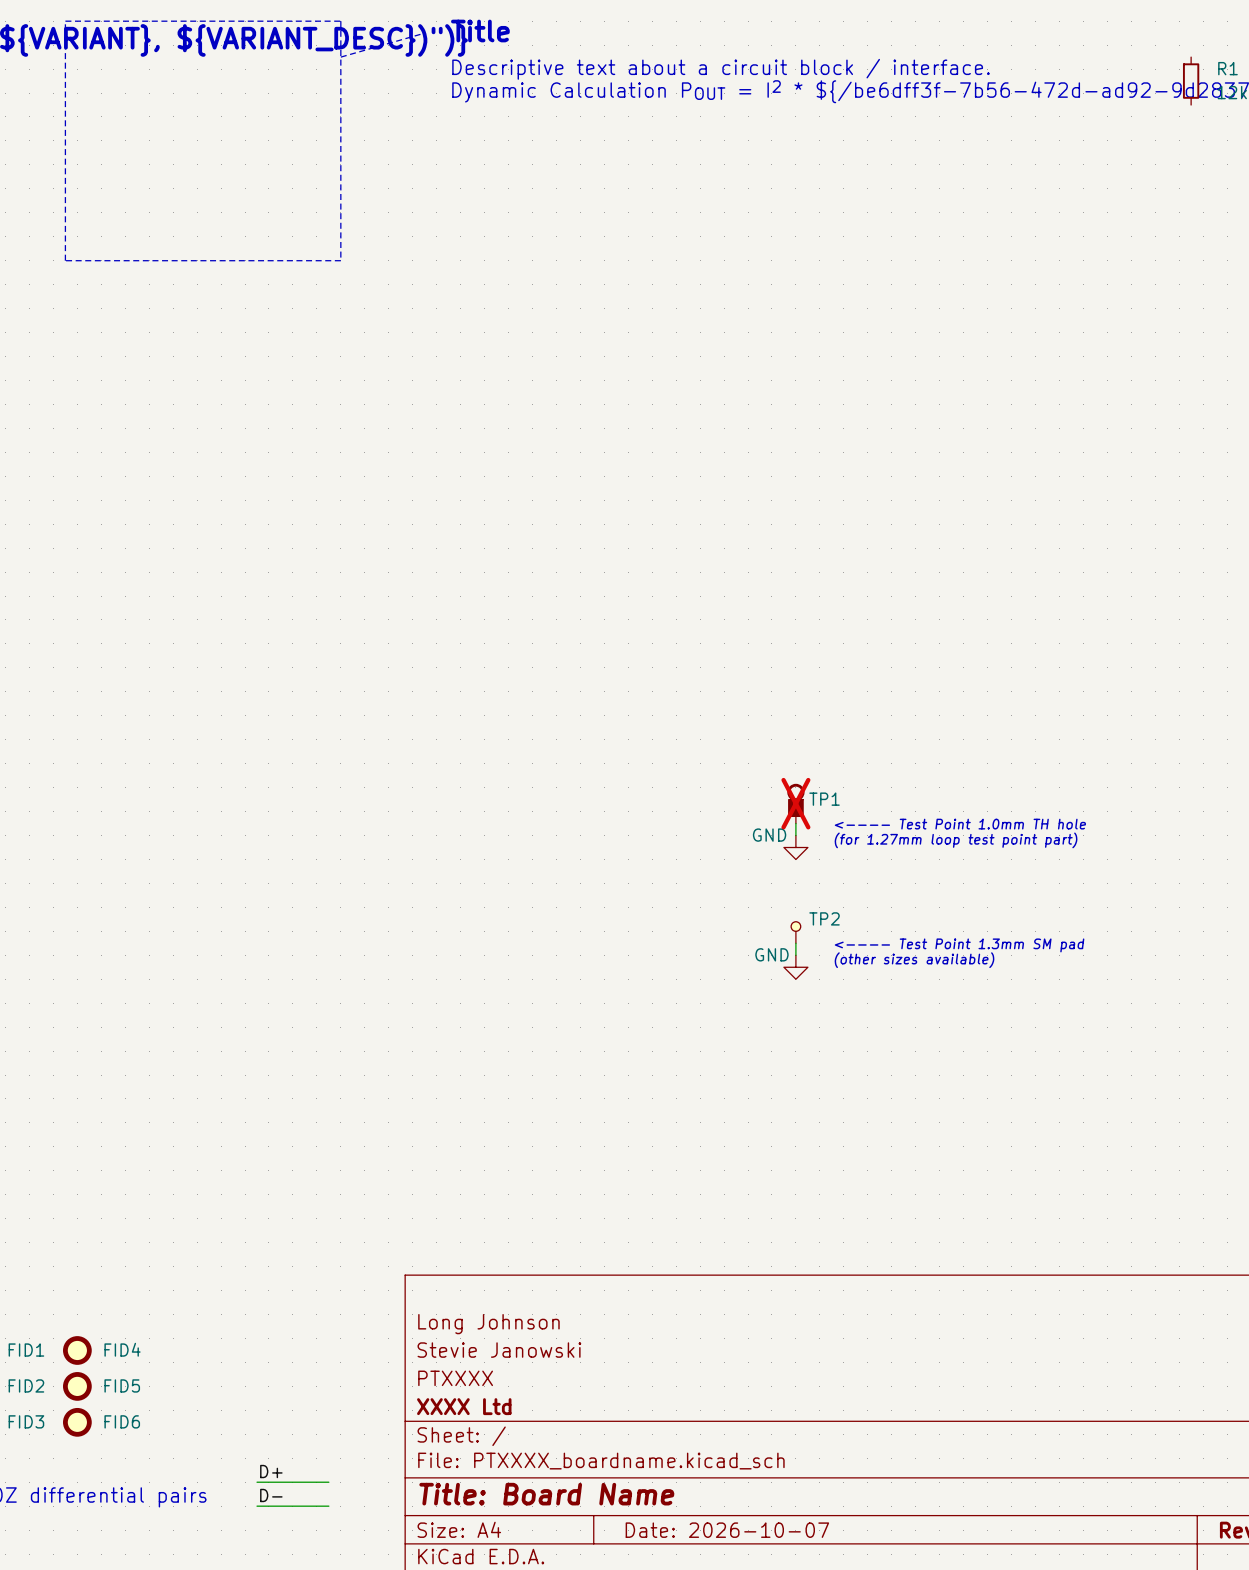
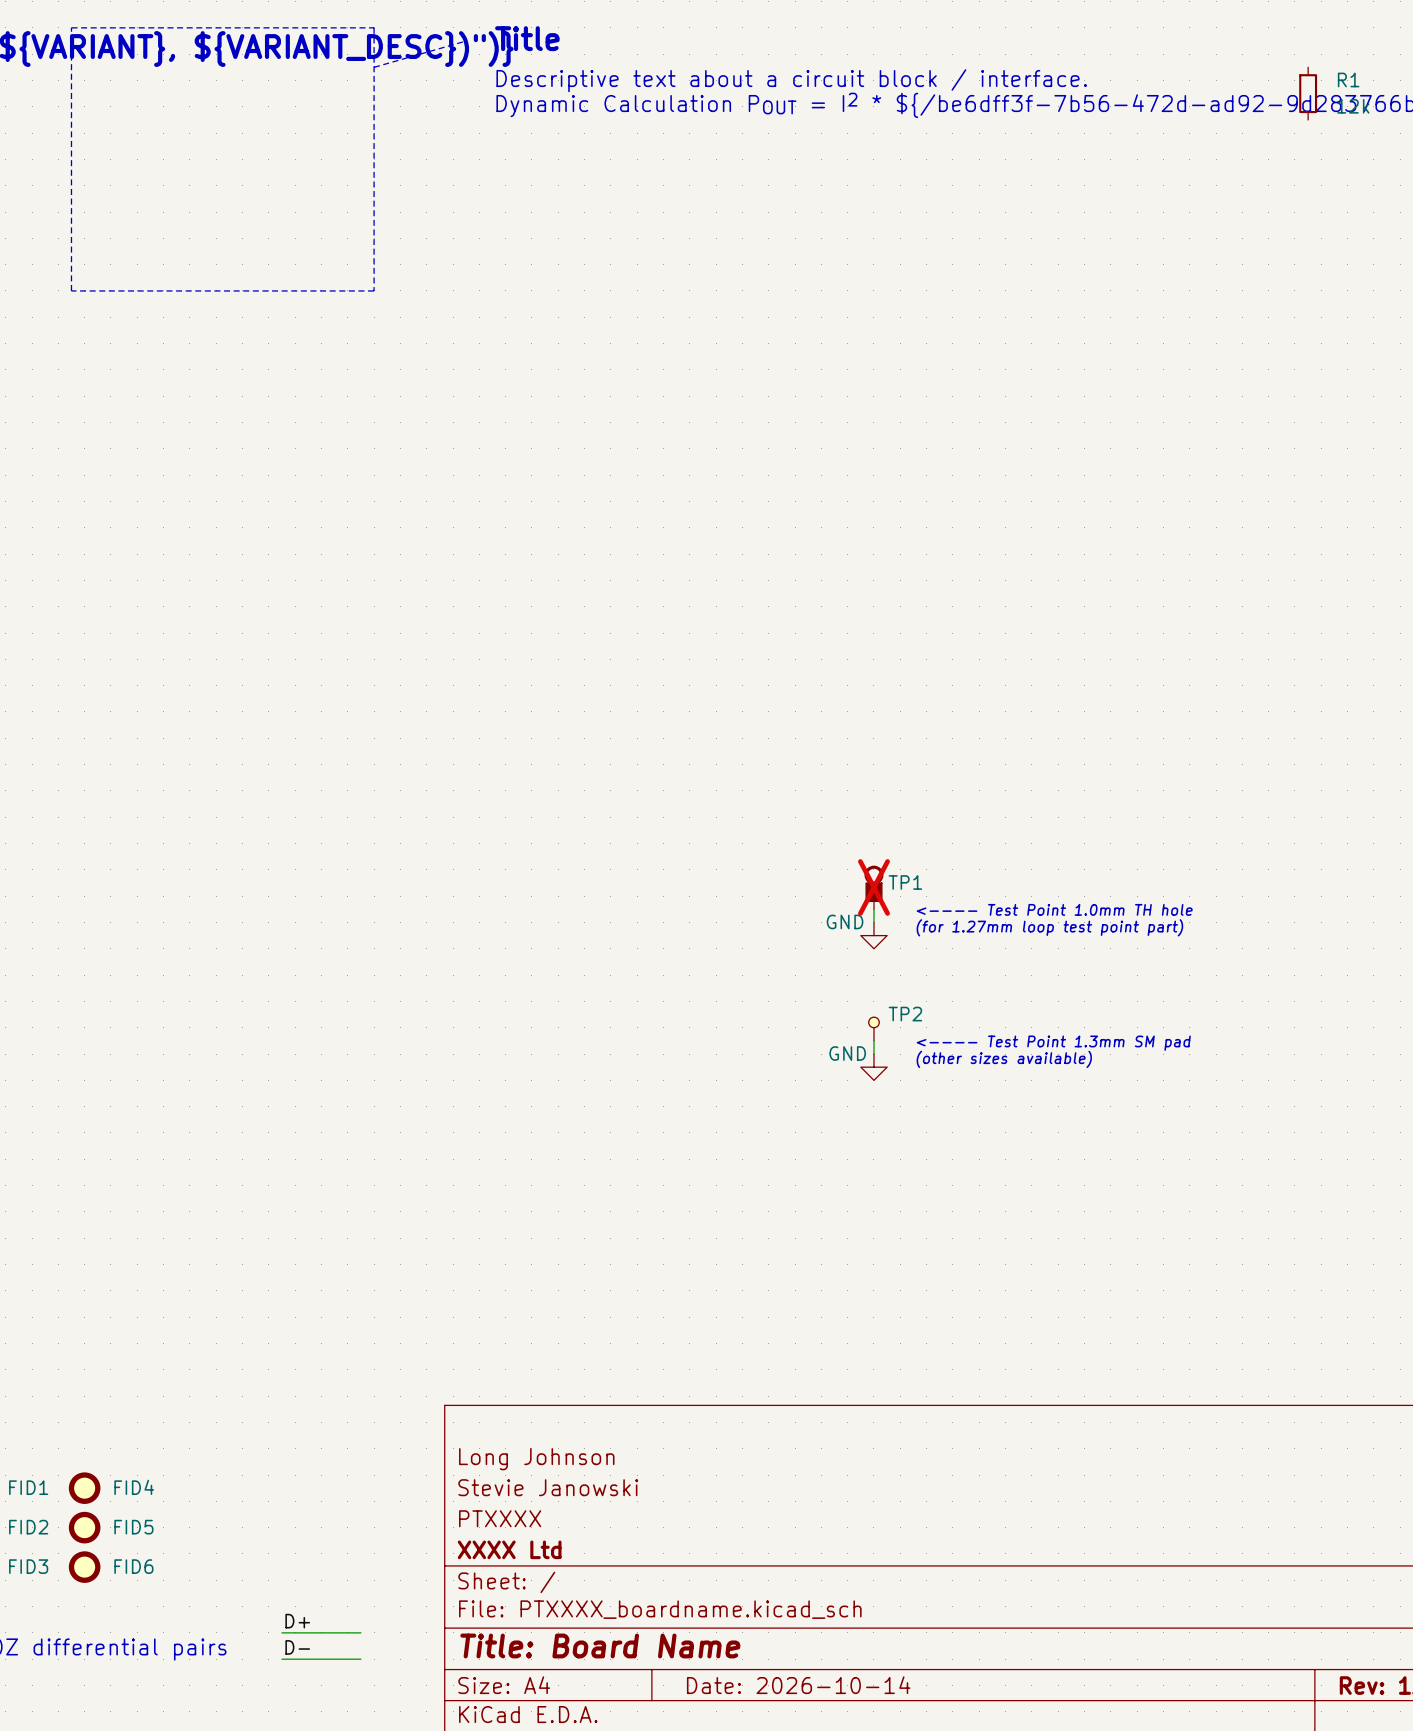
title block: Date: 2026-10-07 (727, 1530) -> Date: 2026-10-14 (798, 1685)

